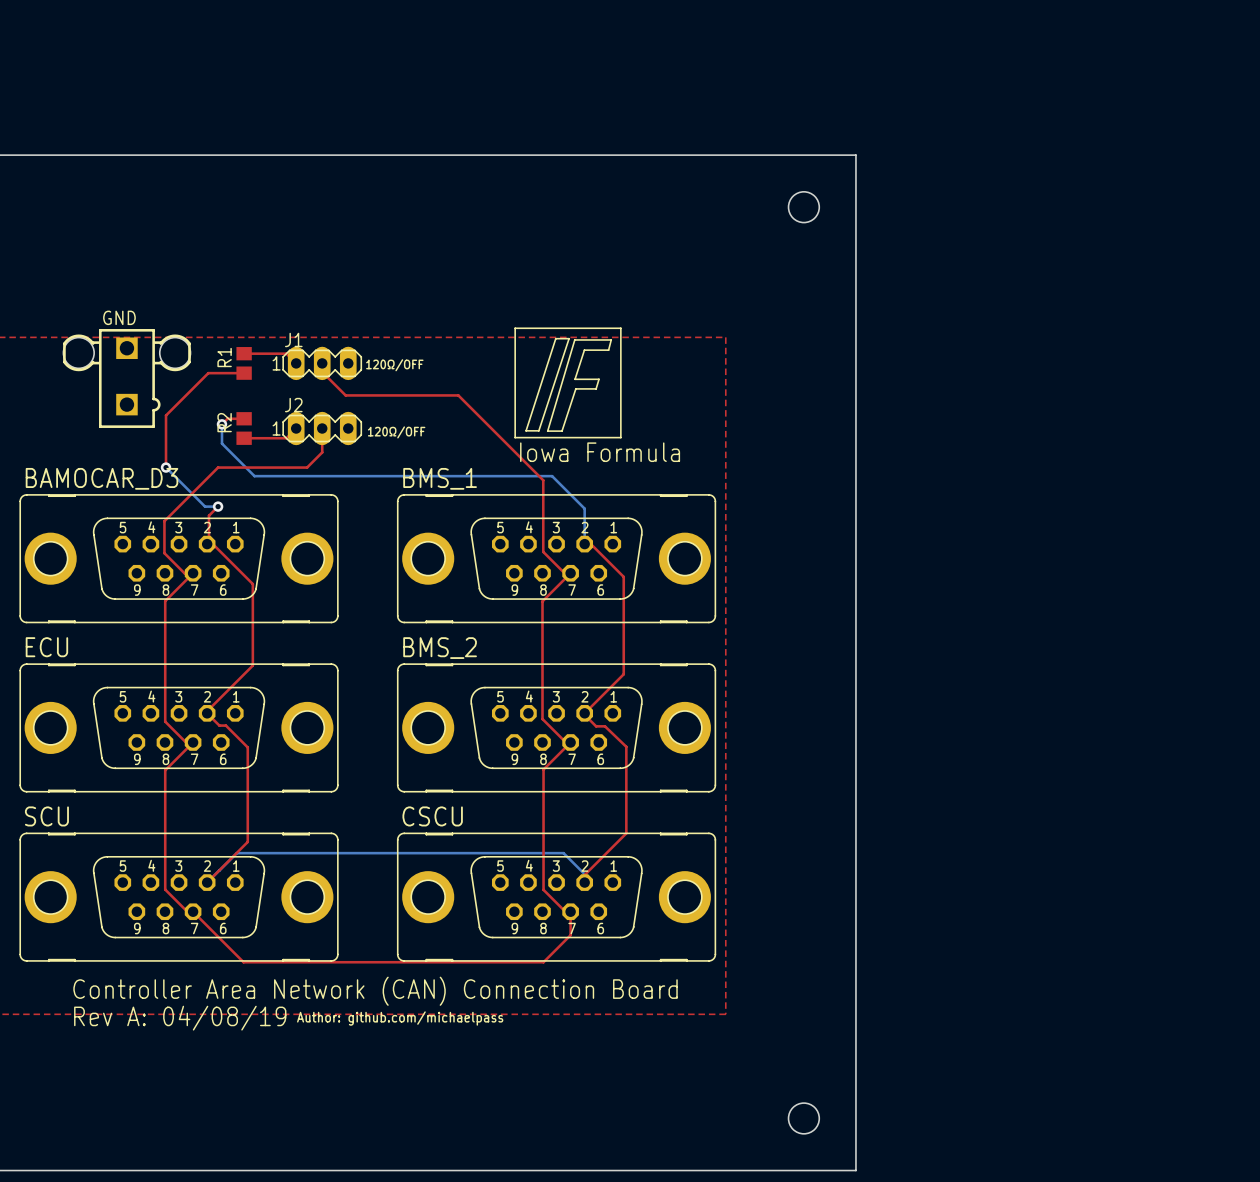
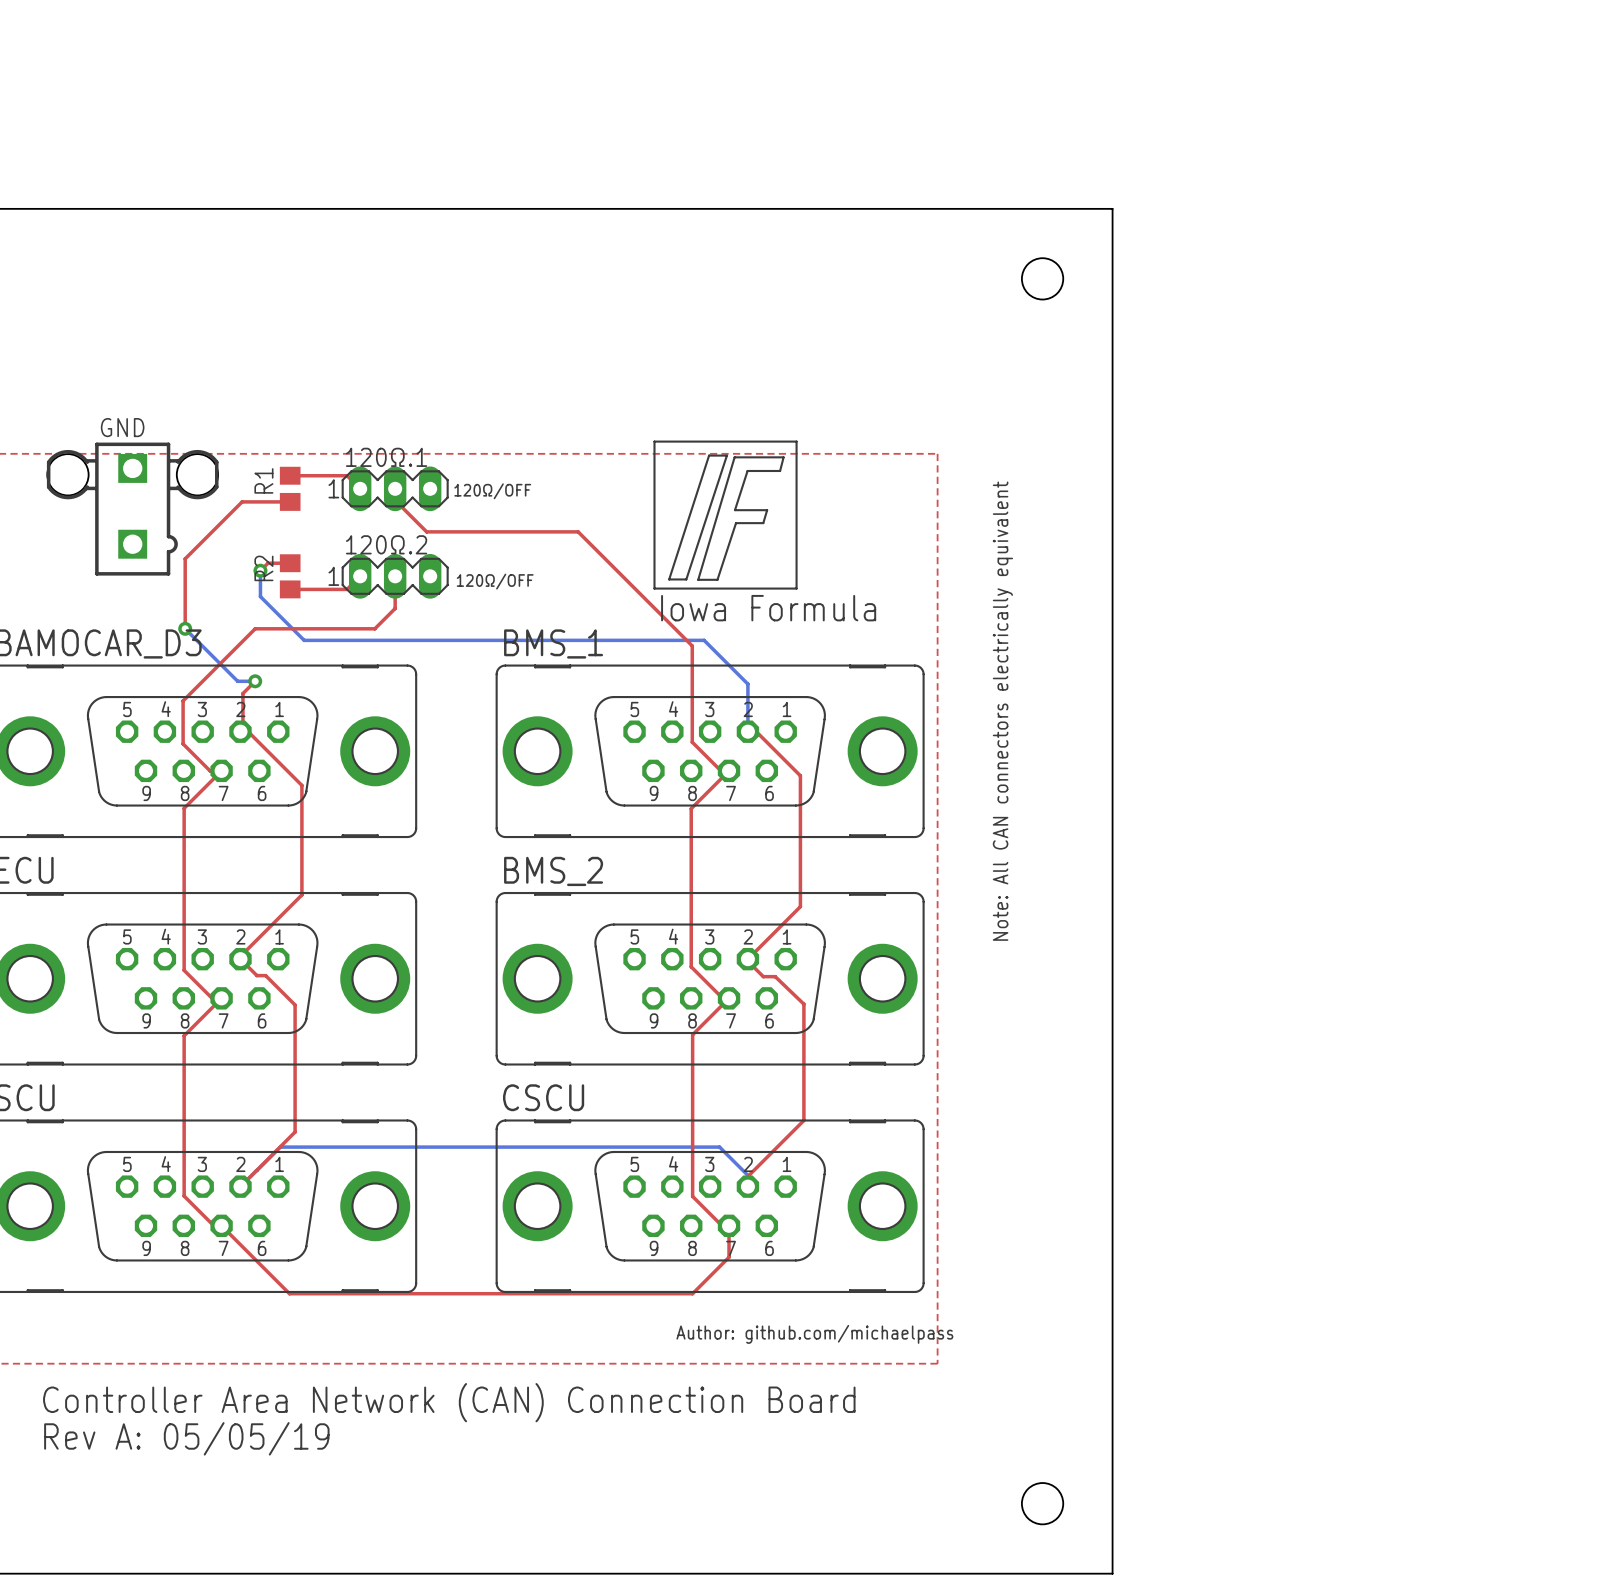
J1 name: J1 (293, 339) -> 120Ω.1 (386, 457)
J2 name: J2 (293, 405) -> 120Ω.2 (386, 544)
text: none -> Note: All CAN connectors electrically equivalent (1002, 711)
text position: Controller Area Network (CAN) Connection Board (375, 991) -> Controller Area Network (CAN) Connection Board (449, 1402)
text: Rev A: 04/08/19 (180, 1018) -> none
text position: Author: github.com/michaelpass (400, 1018) -> Author: github.com/michaelpass (814, 1334)
text: none -> Rev A: 05/05/19 (186, 1438)

